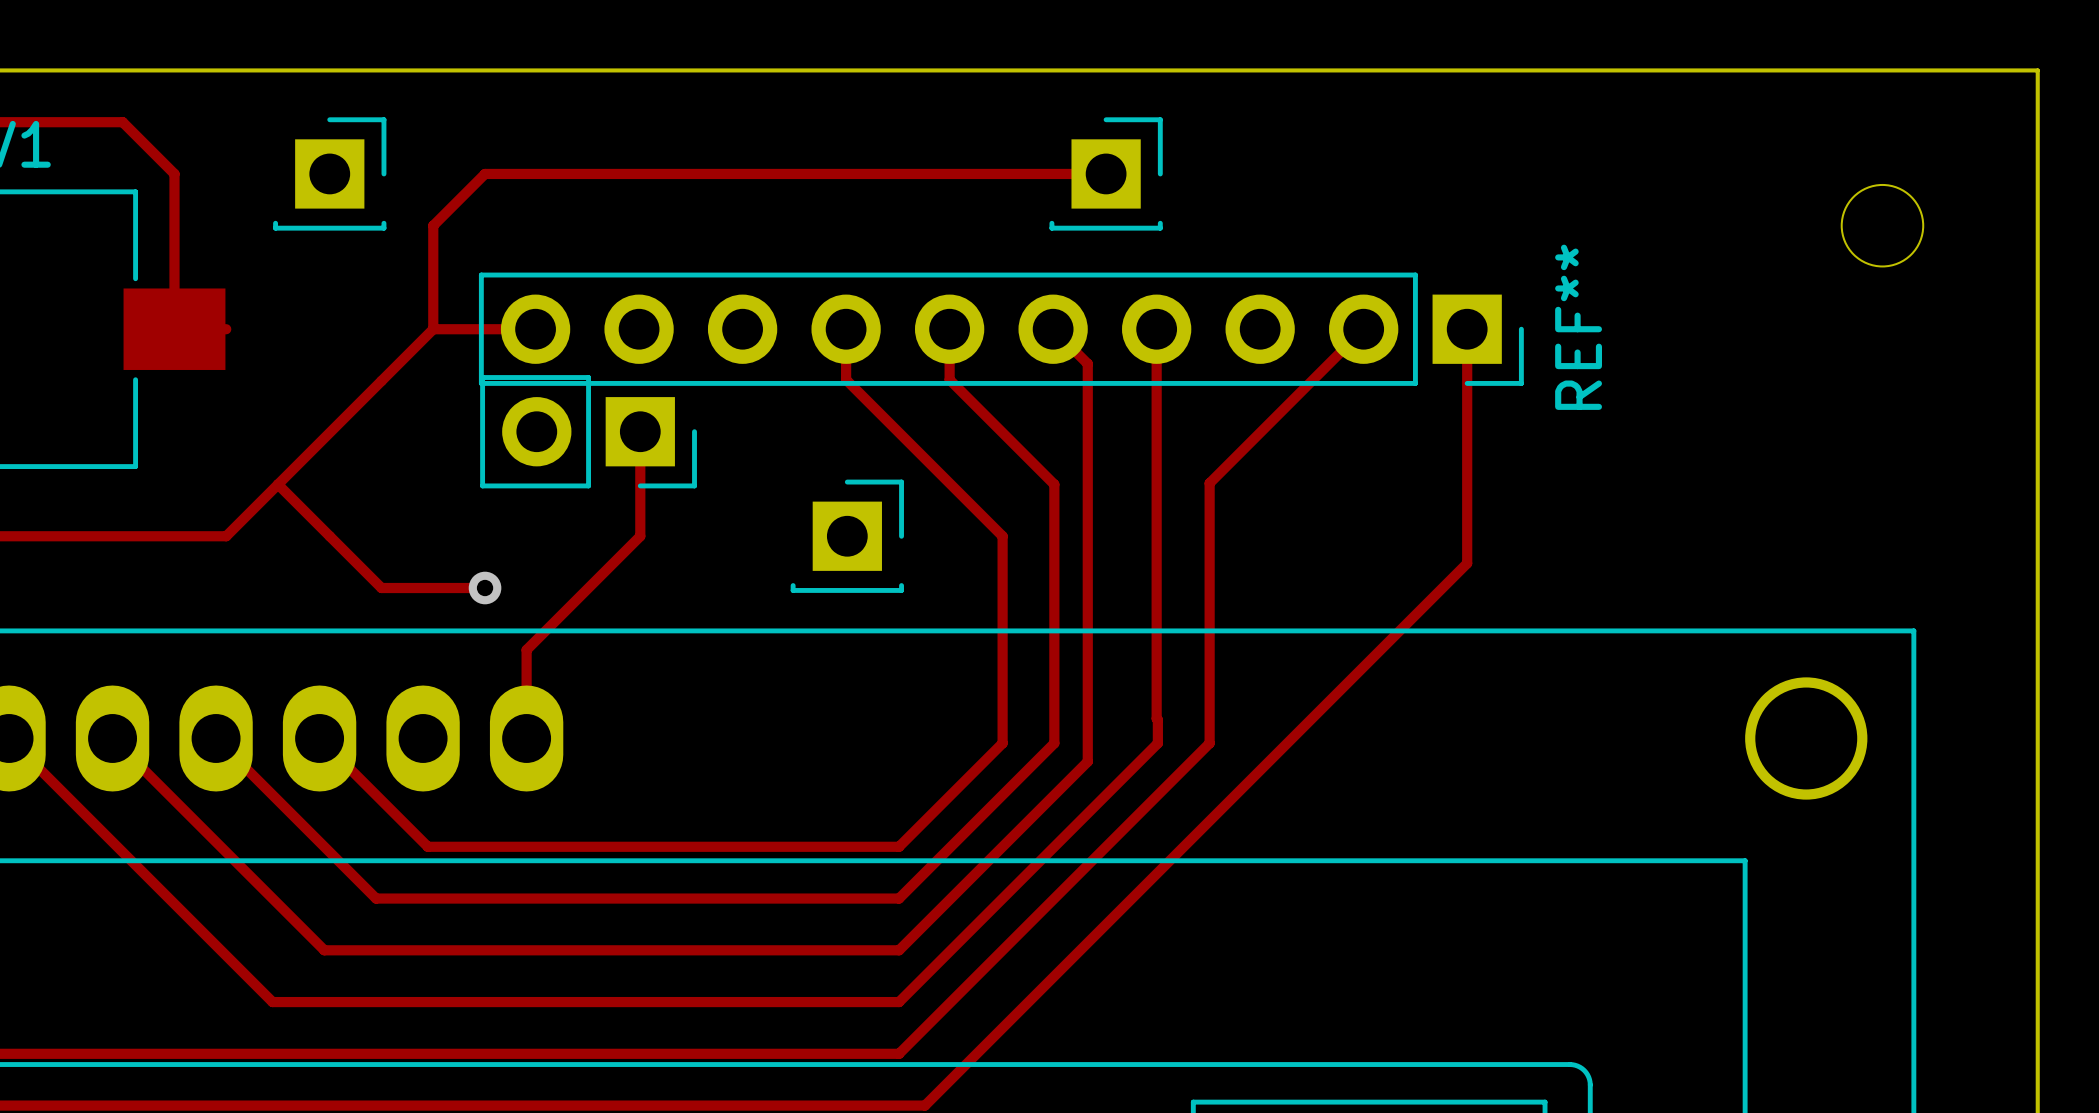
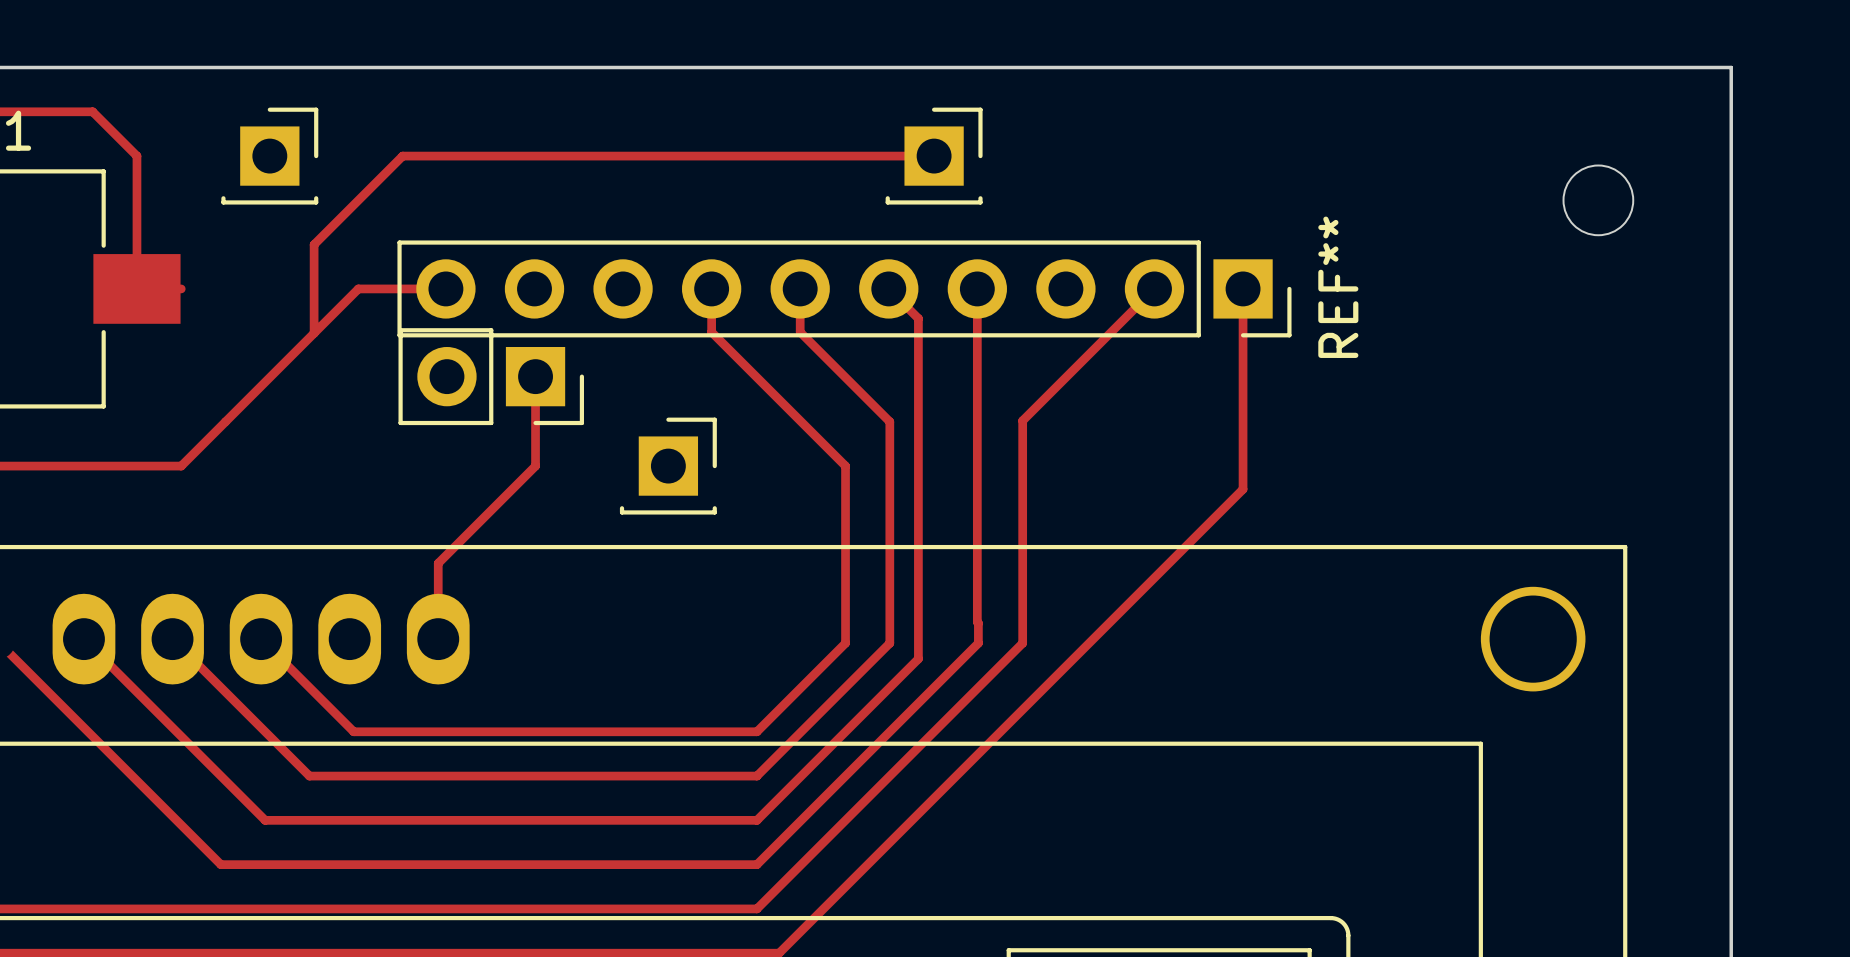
track: (433, 225) (433, 329) -> (358, 200) (314, 244) (314, 333)
track: (278, 484) (381, 588) (485, 588) -> none
part position: (847, 536) -> (668, 466)
via: (485, 588) -> none

